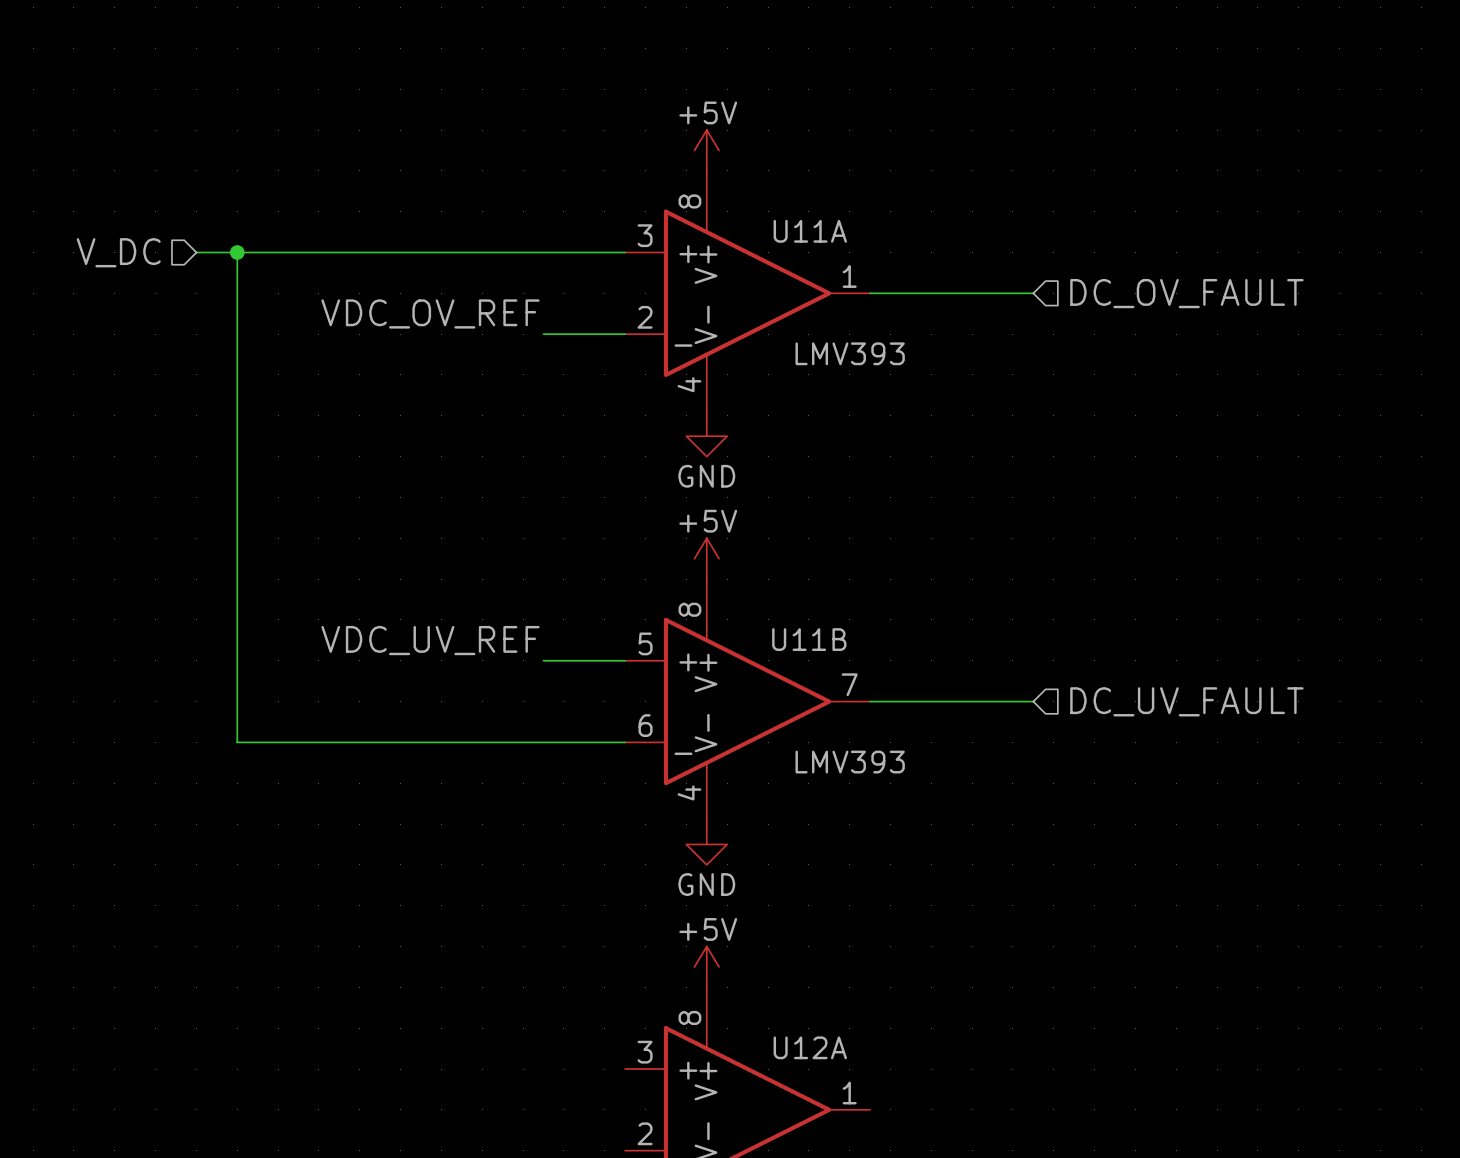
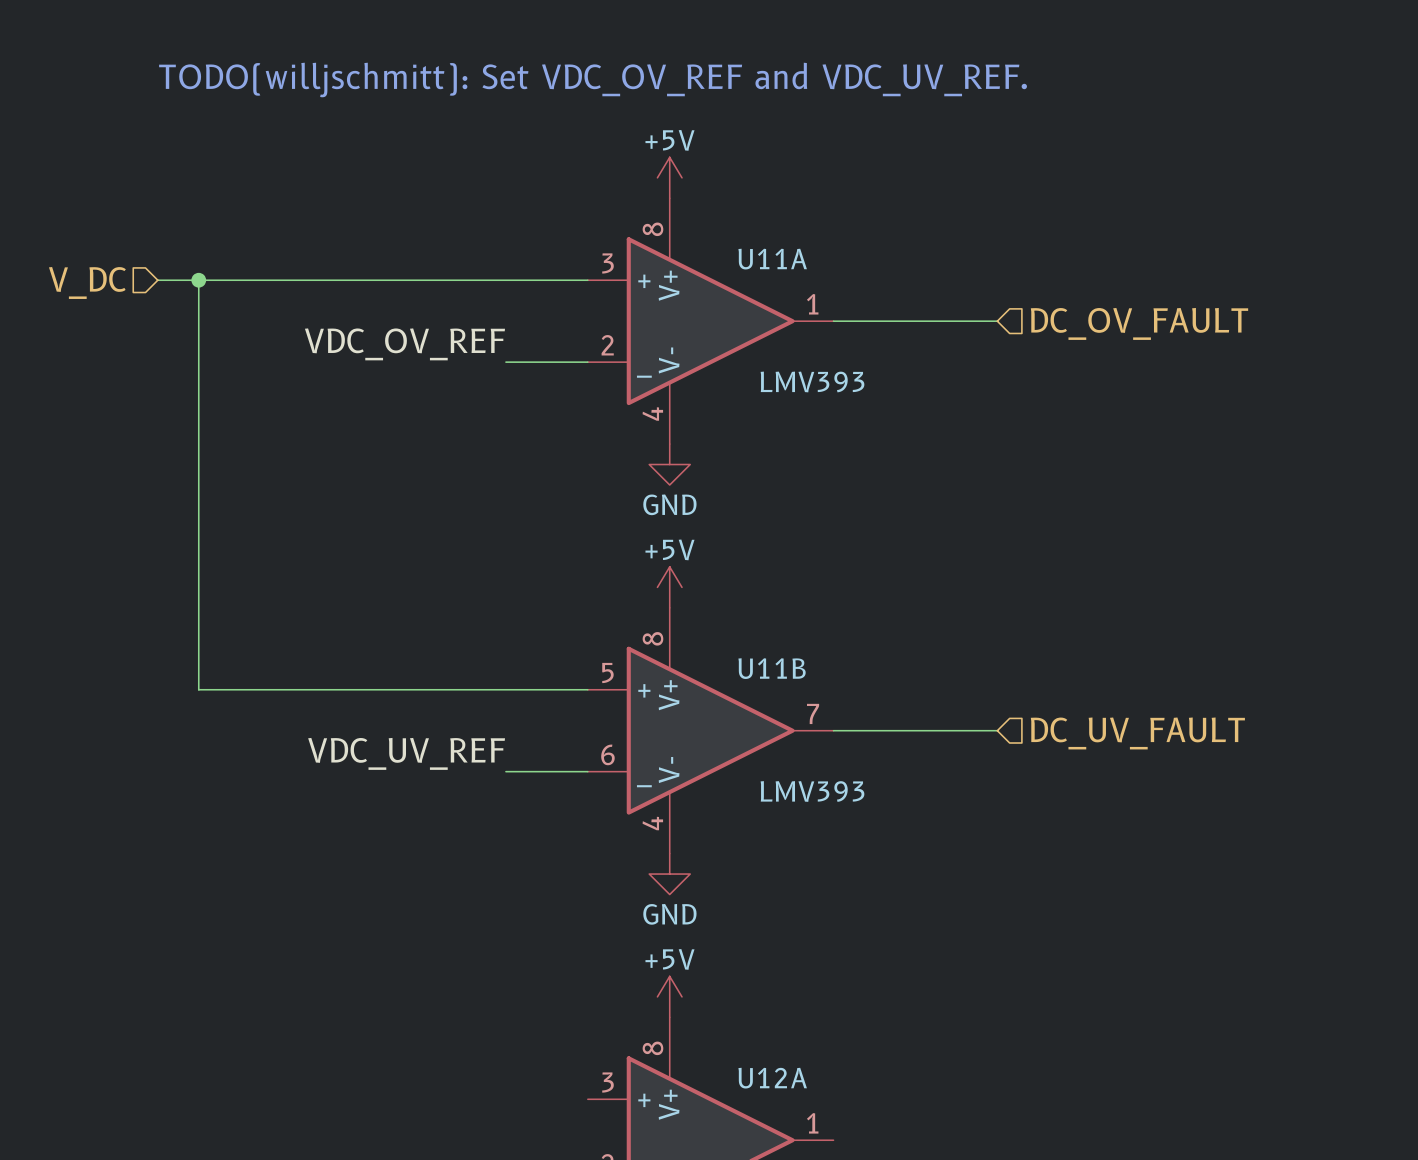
text: none -> TODO(willjschmitt): Set VDC_OV_REF and VDC_UV_REF. (593, 79)
label position: VDC_UV_REF (430, 640) -> VDC_UV_REF (406, 753)
wire: (237, 660) (237, 742) (543, 742) -> (198, 689) (505, 689)

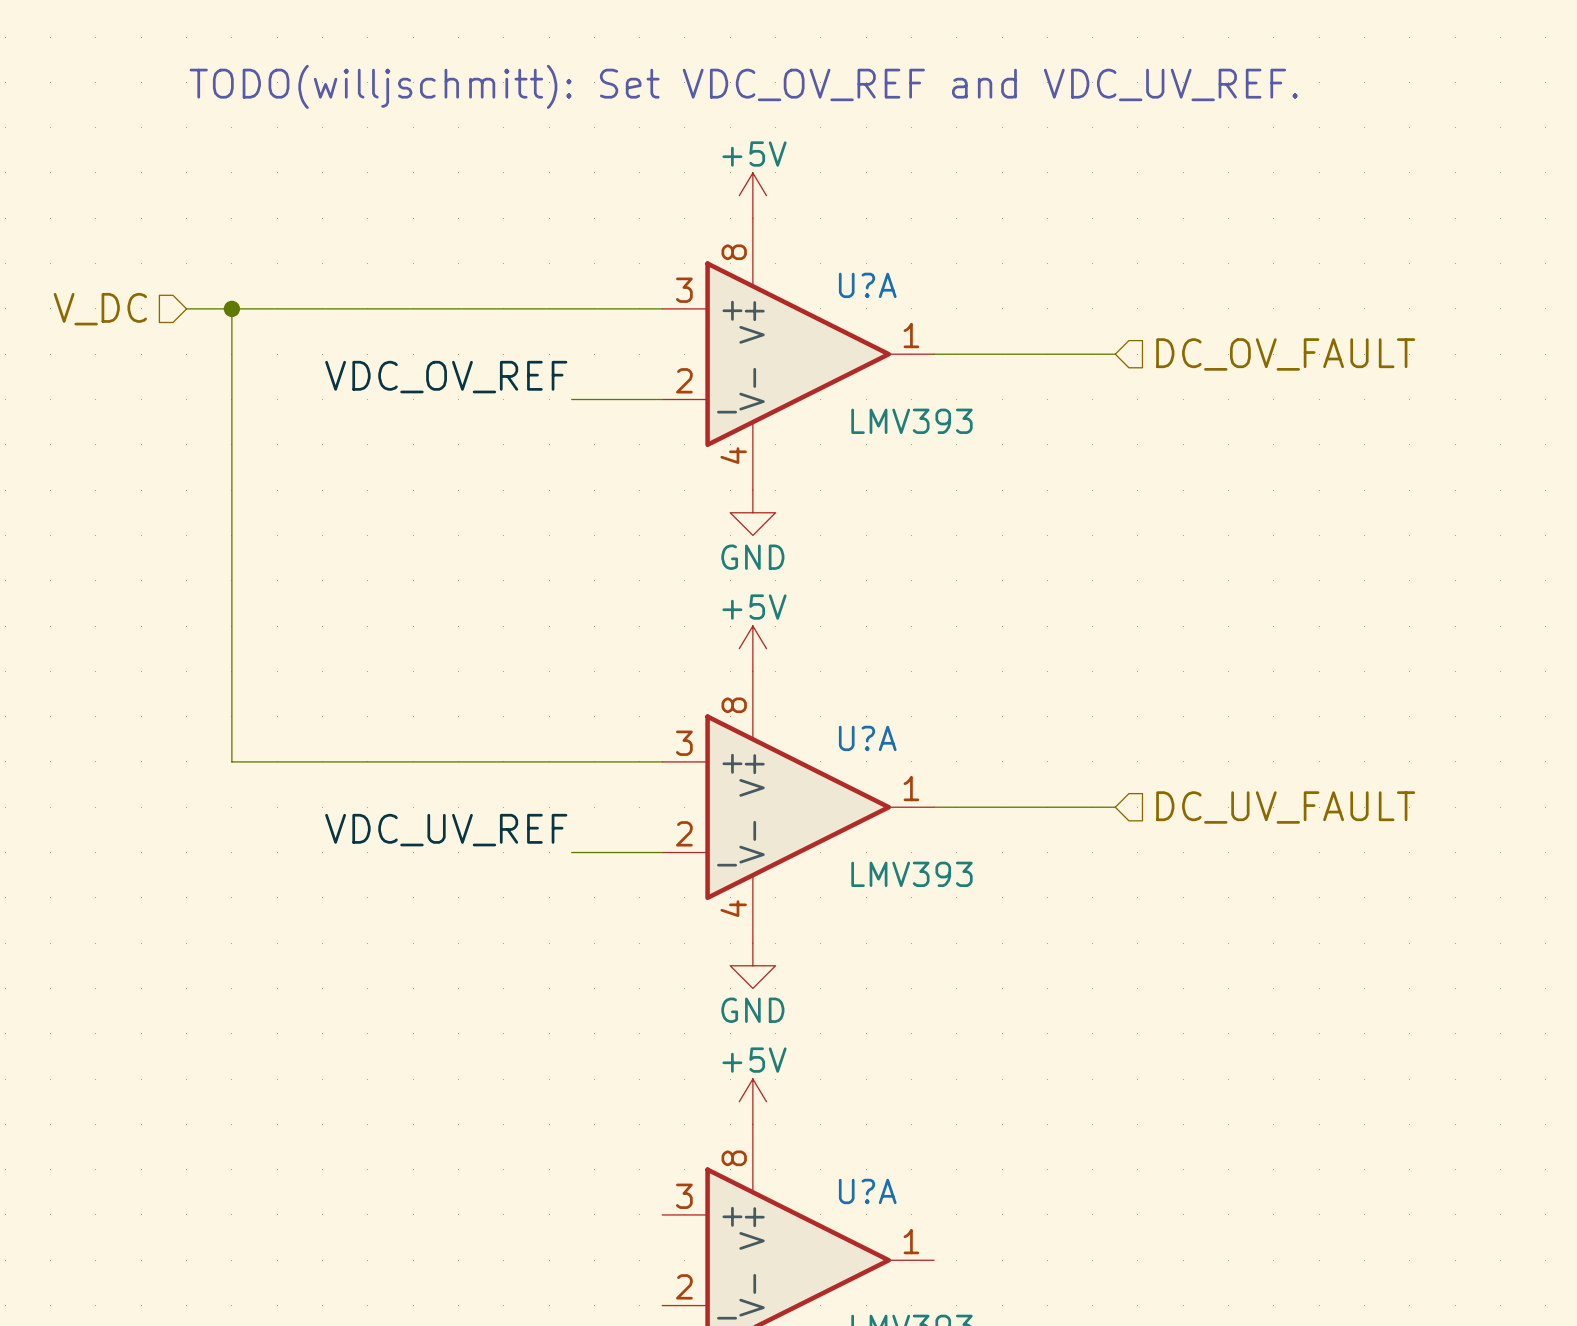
U11A name: U11A (772, 259) -> U?A (867, 285)
U11B name: U11B (772, 668) -> U?A (867, 738)
U11B pin number: 5 (607, 673) -> 3 (684, 743)
U11B pin number: 7 (813, 713) -> 1 (911, 788)
U11B pin number: 6 (607, 754) -> 2 (684, 833)
U12A name: U12A (772, 1078) -> U?A (867, 1191)

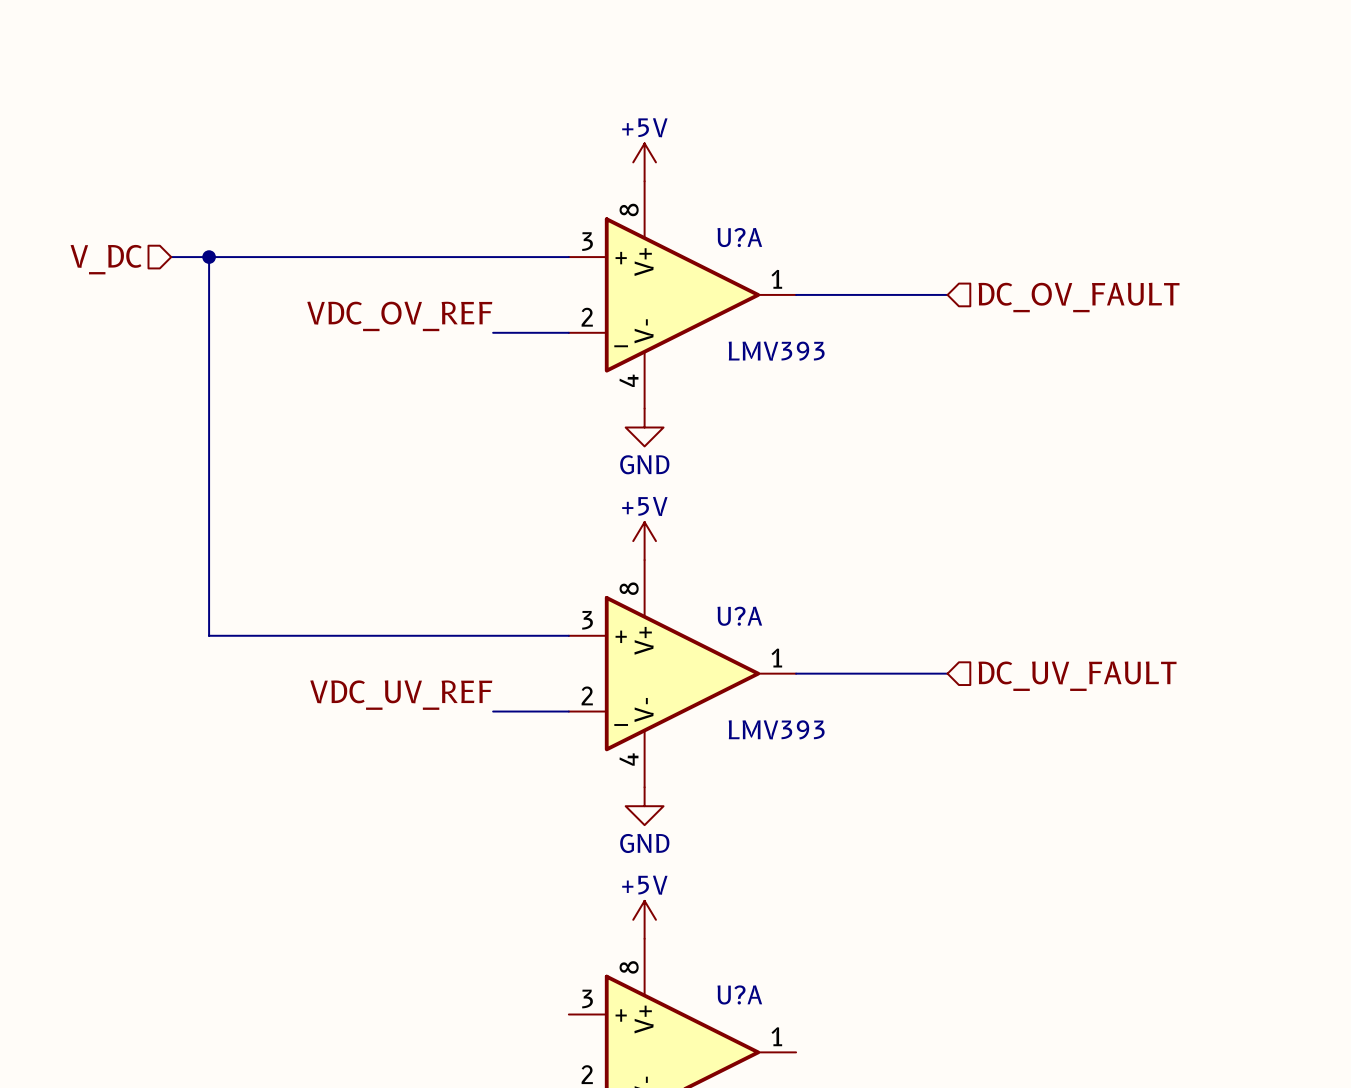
text: TODO(willjschmitt): Set VDC_OV_REF and VDC_UV_REF. (743, 86) -> none

